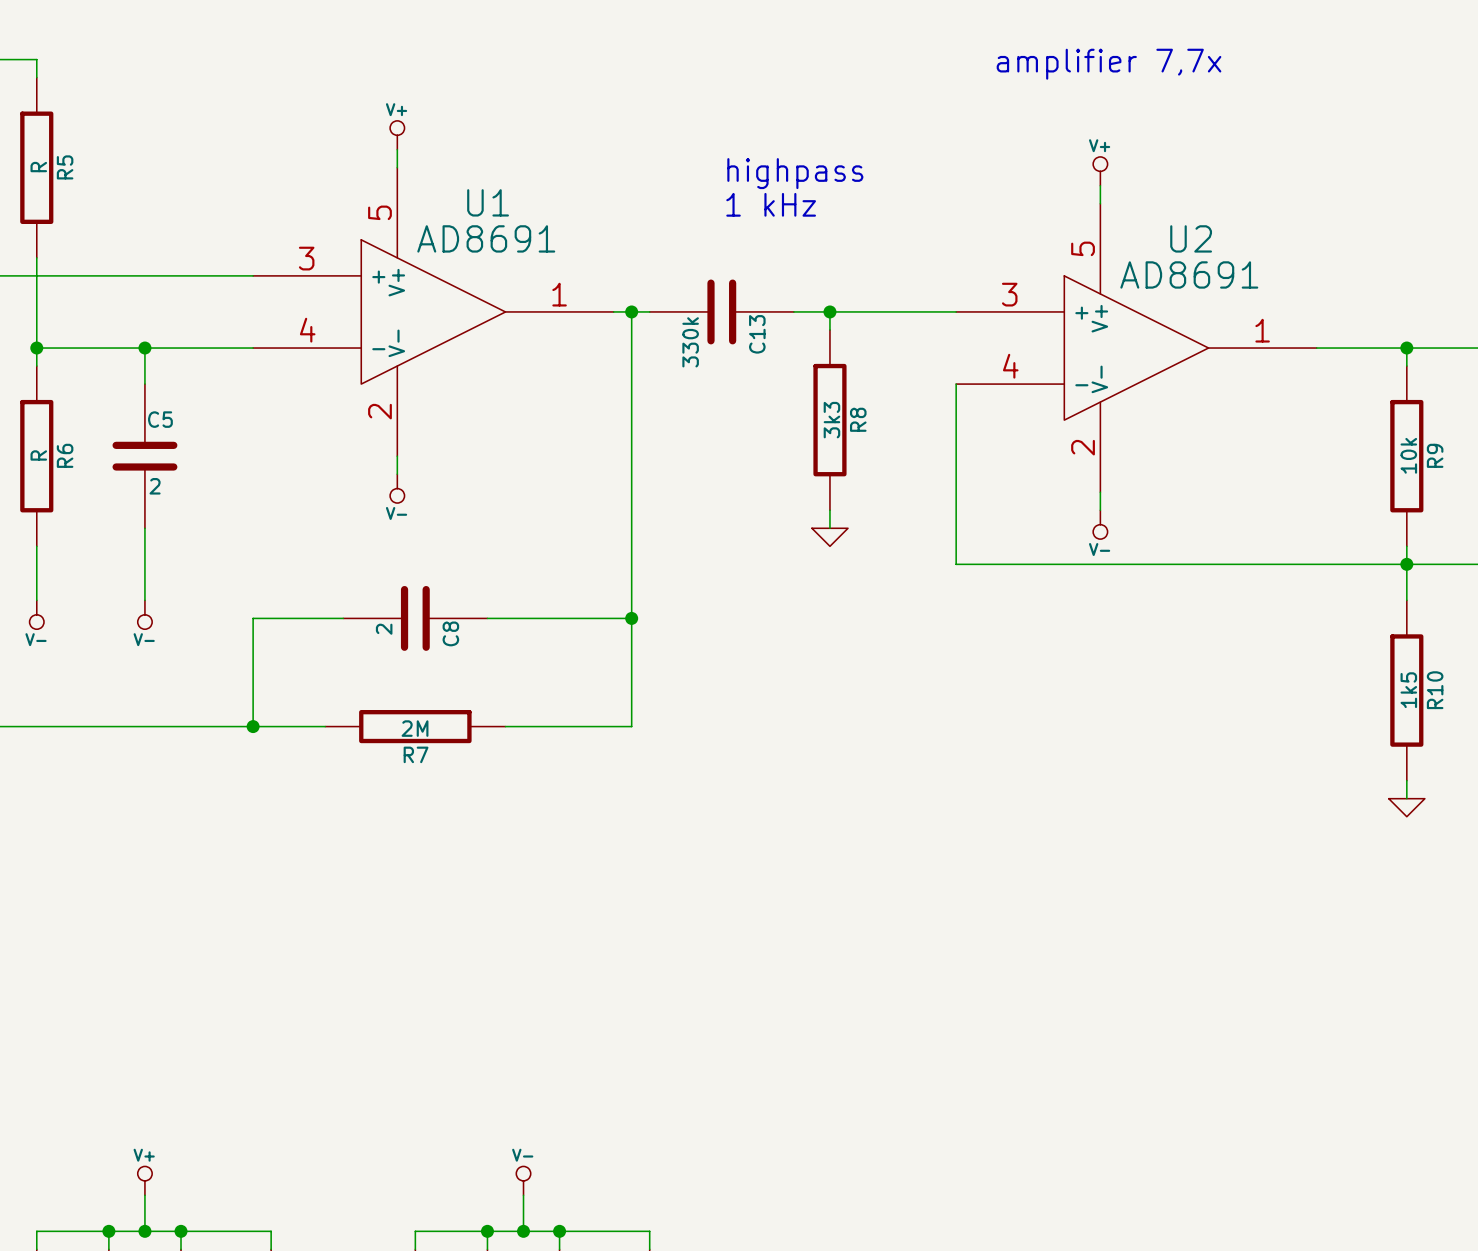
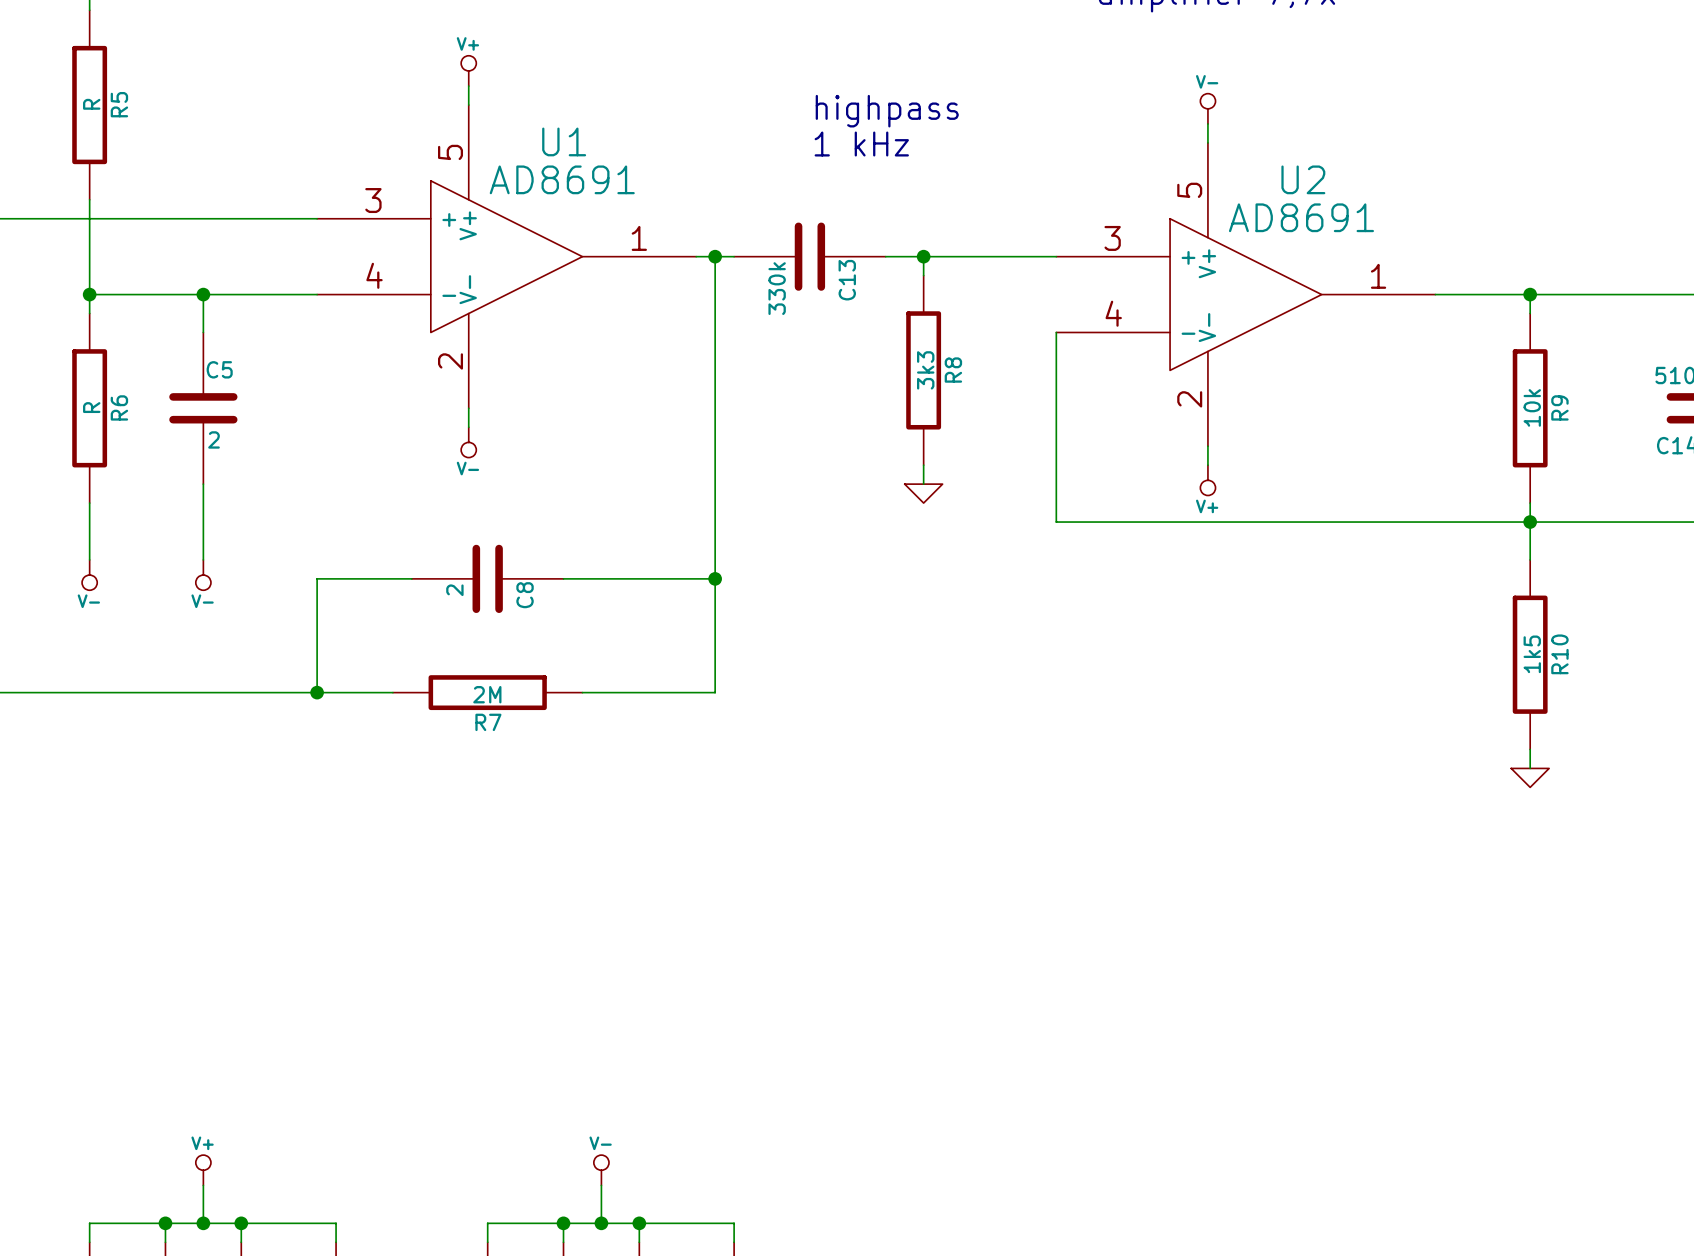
power symbol: V+ (1100, 171) -> V- (1207, 108)
power symbol: V- (1100, 524) -> V+ (1207, 480)

